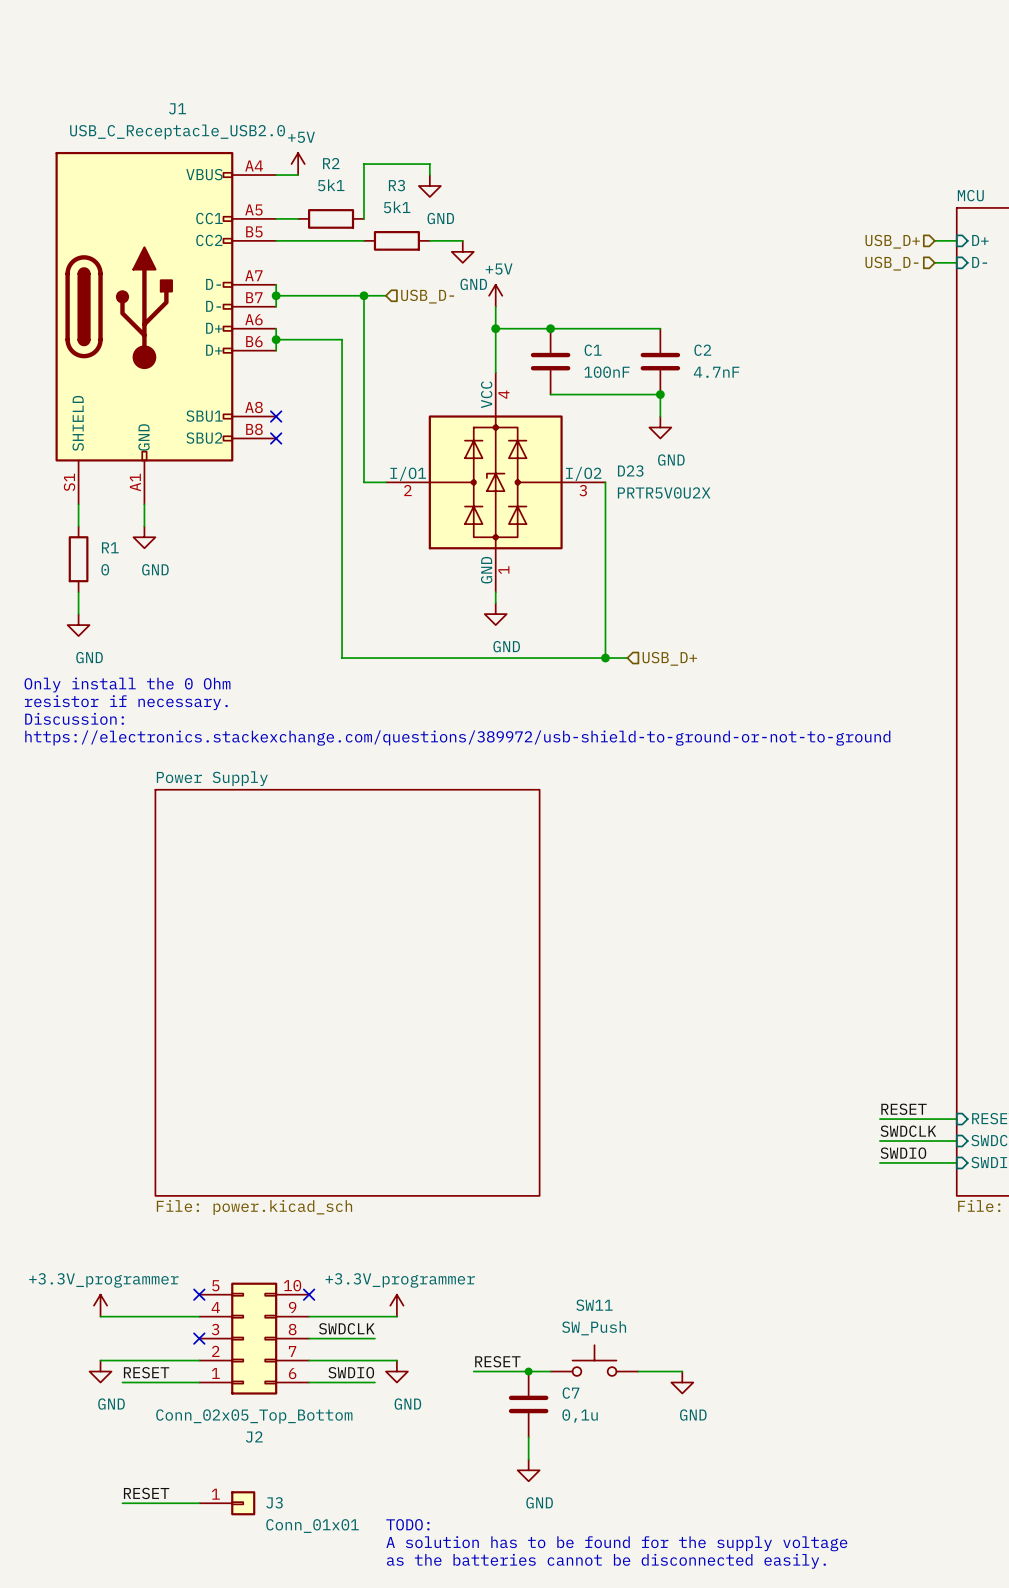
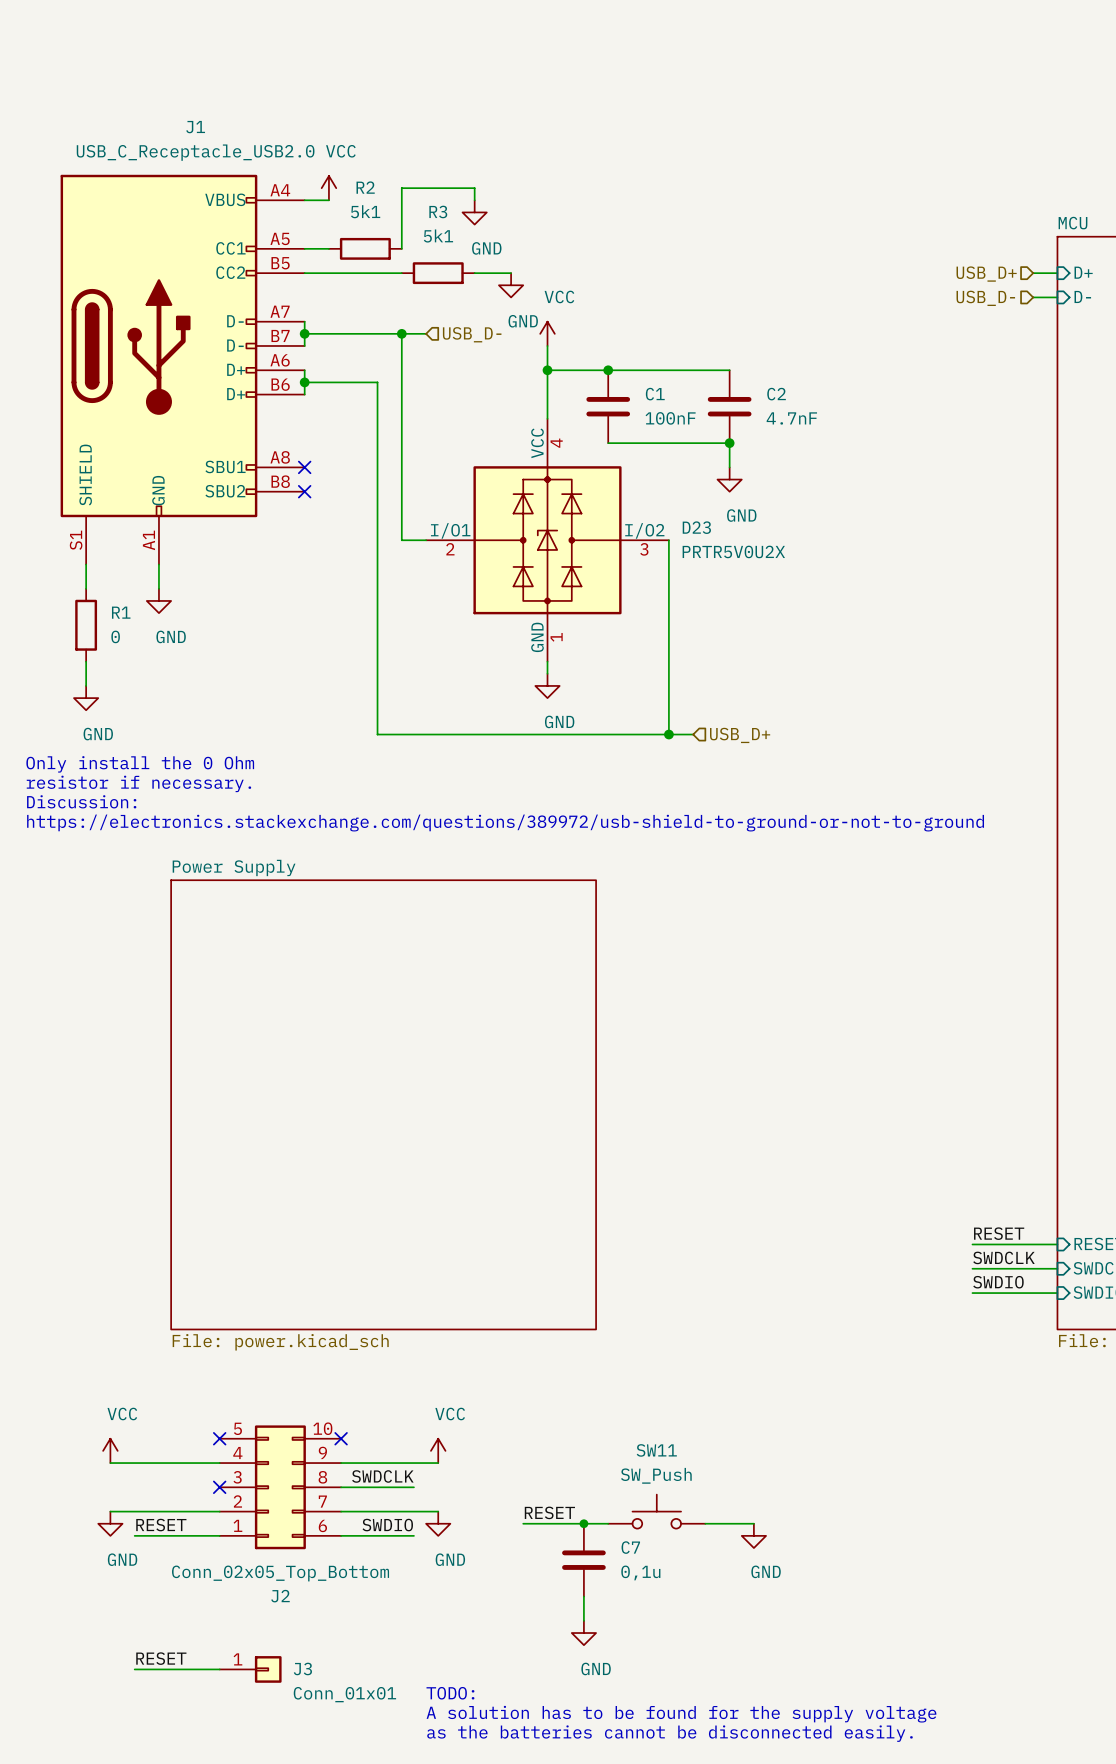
power symbol: +5V (298, 164) -> VCC (328, 188)
power symbol: +5V (495, 295) -> VCC (547, 333)
power symbol: +3.3V_programmer (100, 1305) -> VCC (110, 1450)
power symbol: +3.3V_programmer (396, 1305) -> VCC (438, 1450)

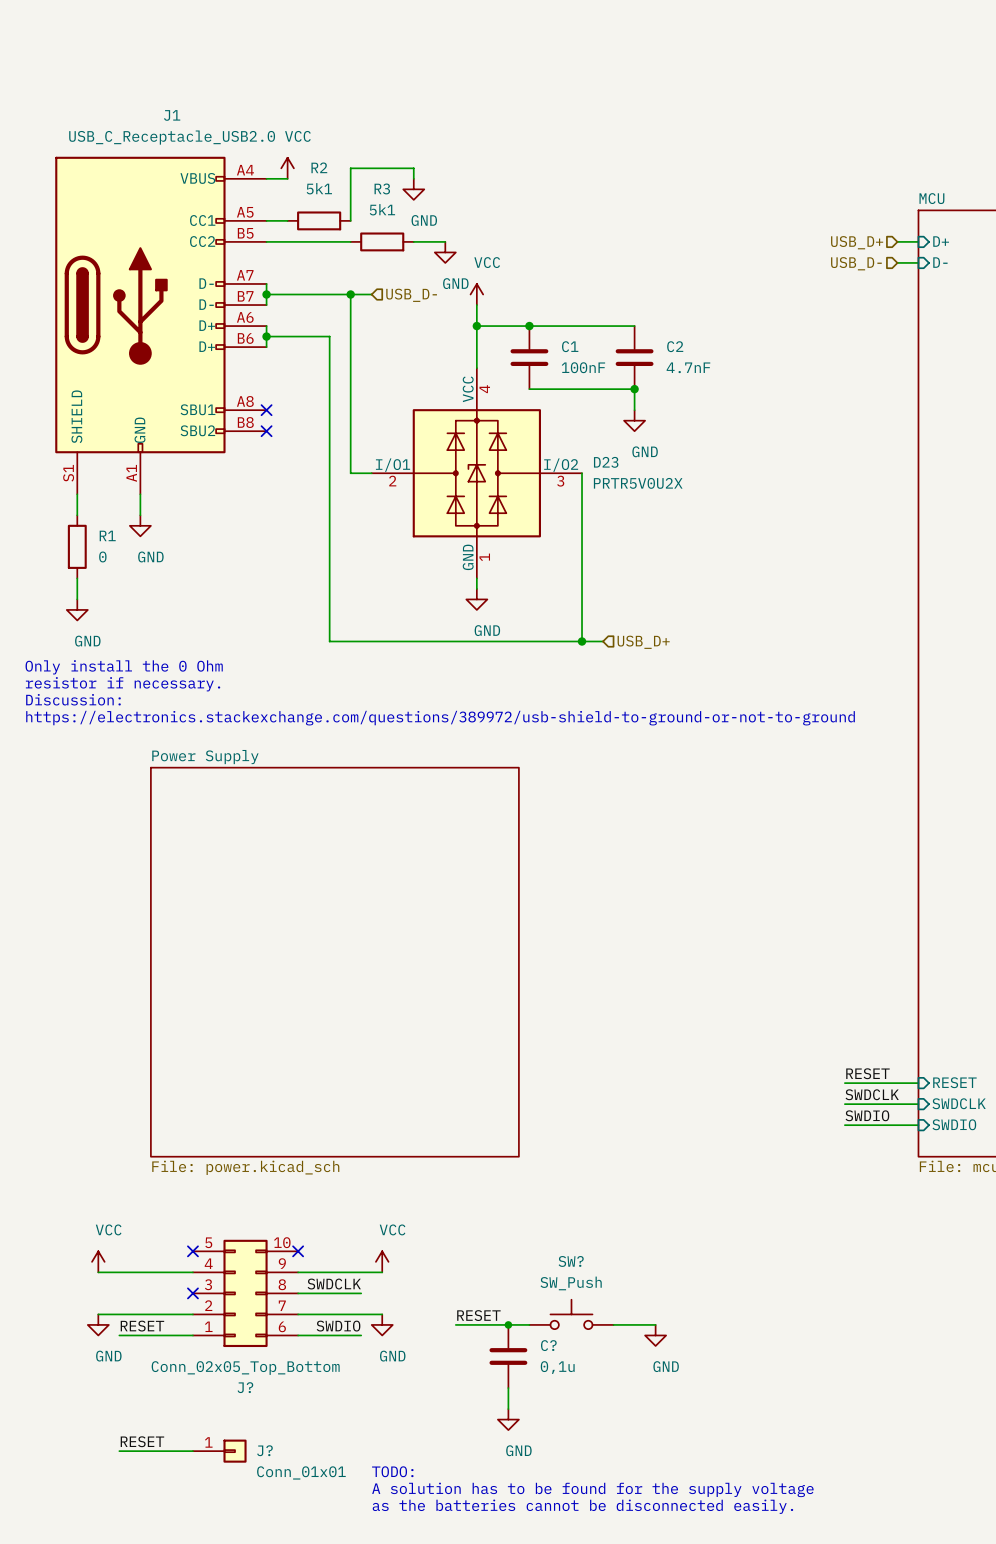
SW11 name: SW11 (656, 1450) -> SW? (571, 1261)
C7 name: C7 (630, 1547) -> C? (548, 1345)
J2 name: J2 (280, 1596) -> J? (245, 1387)
J3 name: J3 (302, 1668) -> J? (264, 1450)

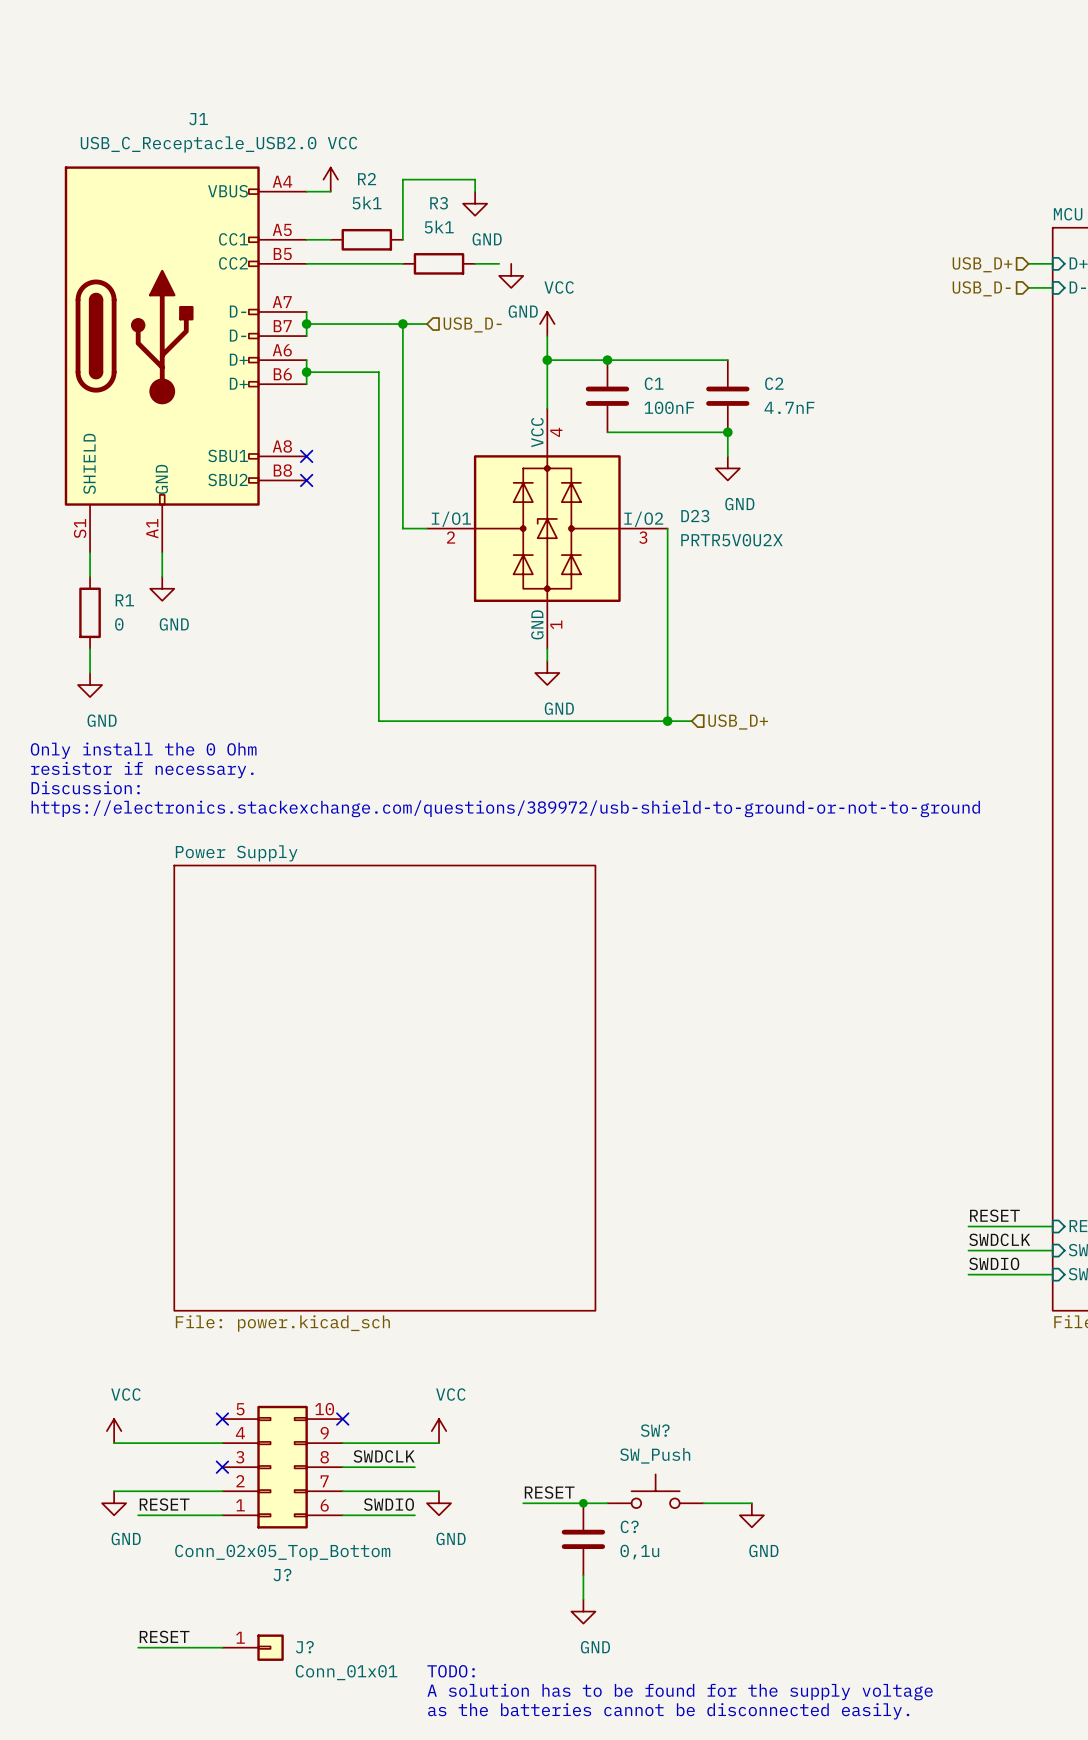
wire: (434, 241) (445, 241) -> none

